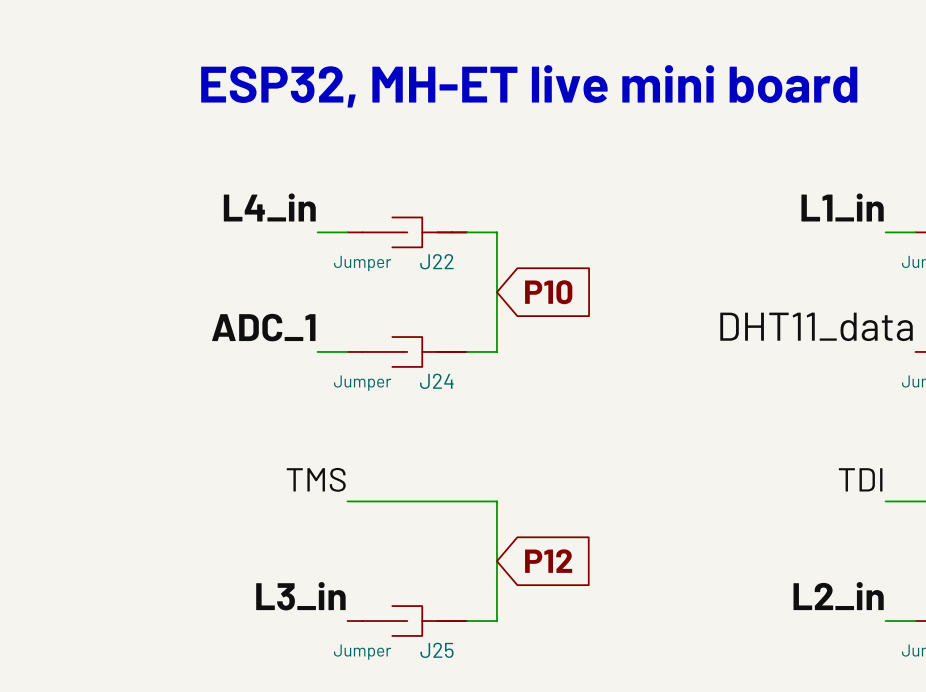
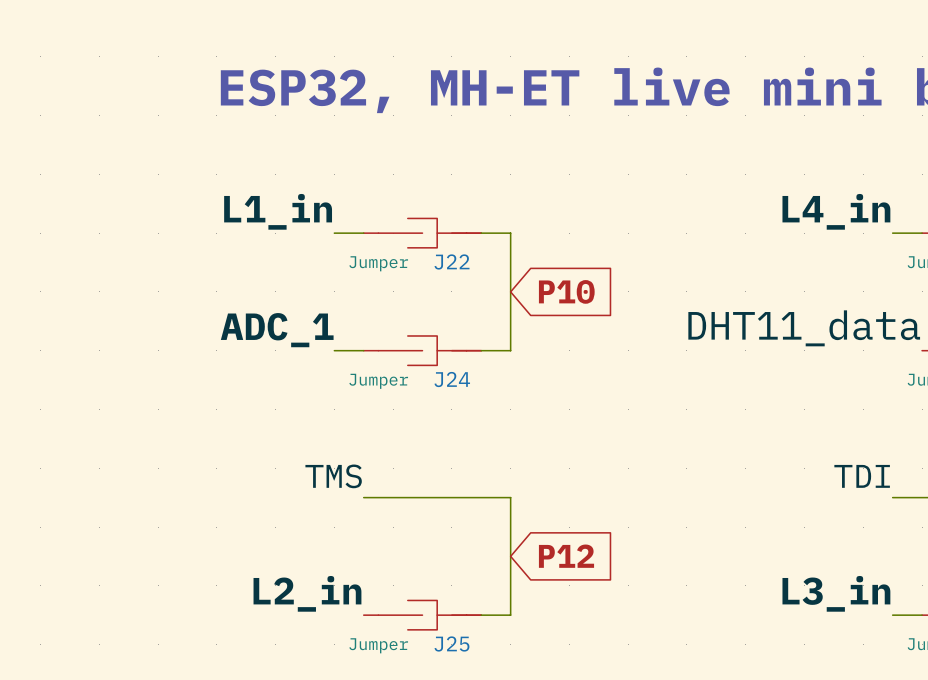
label: L4_in (269, 207) -> L1_in (278, 211)
label: L1_in (842, 207) -> L4_in (836, 211)
label: L3_in (300, 596) -> L2_in (307, 593)
label: L2_in (838, 596) -> L3_in (836, 593)

